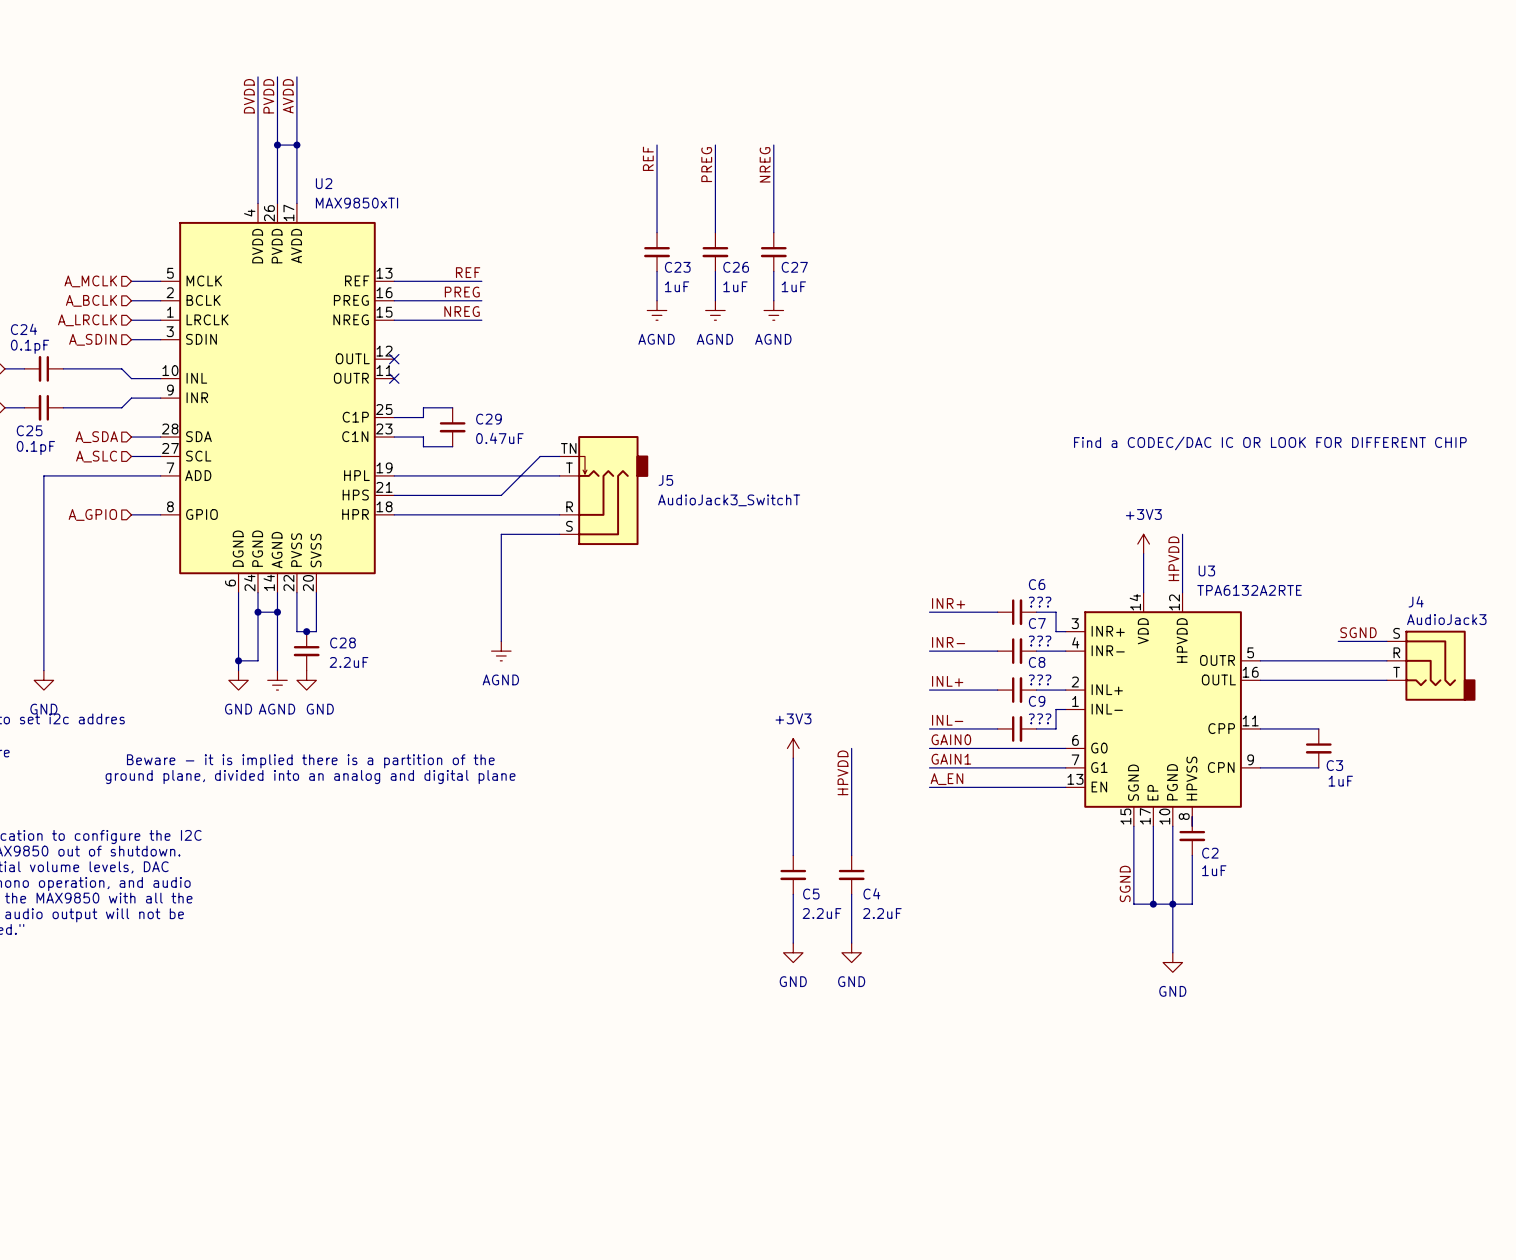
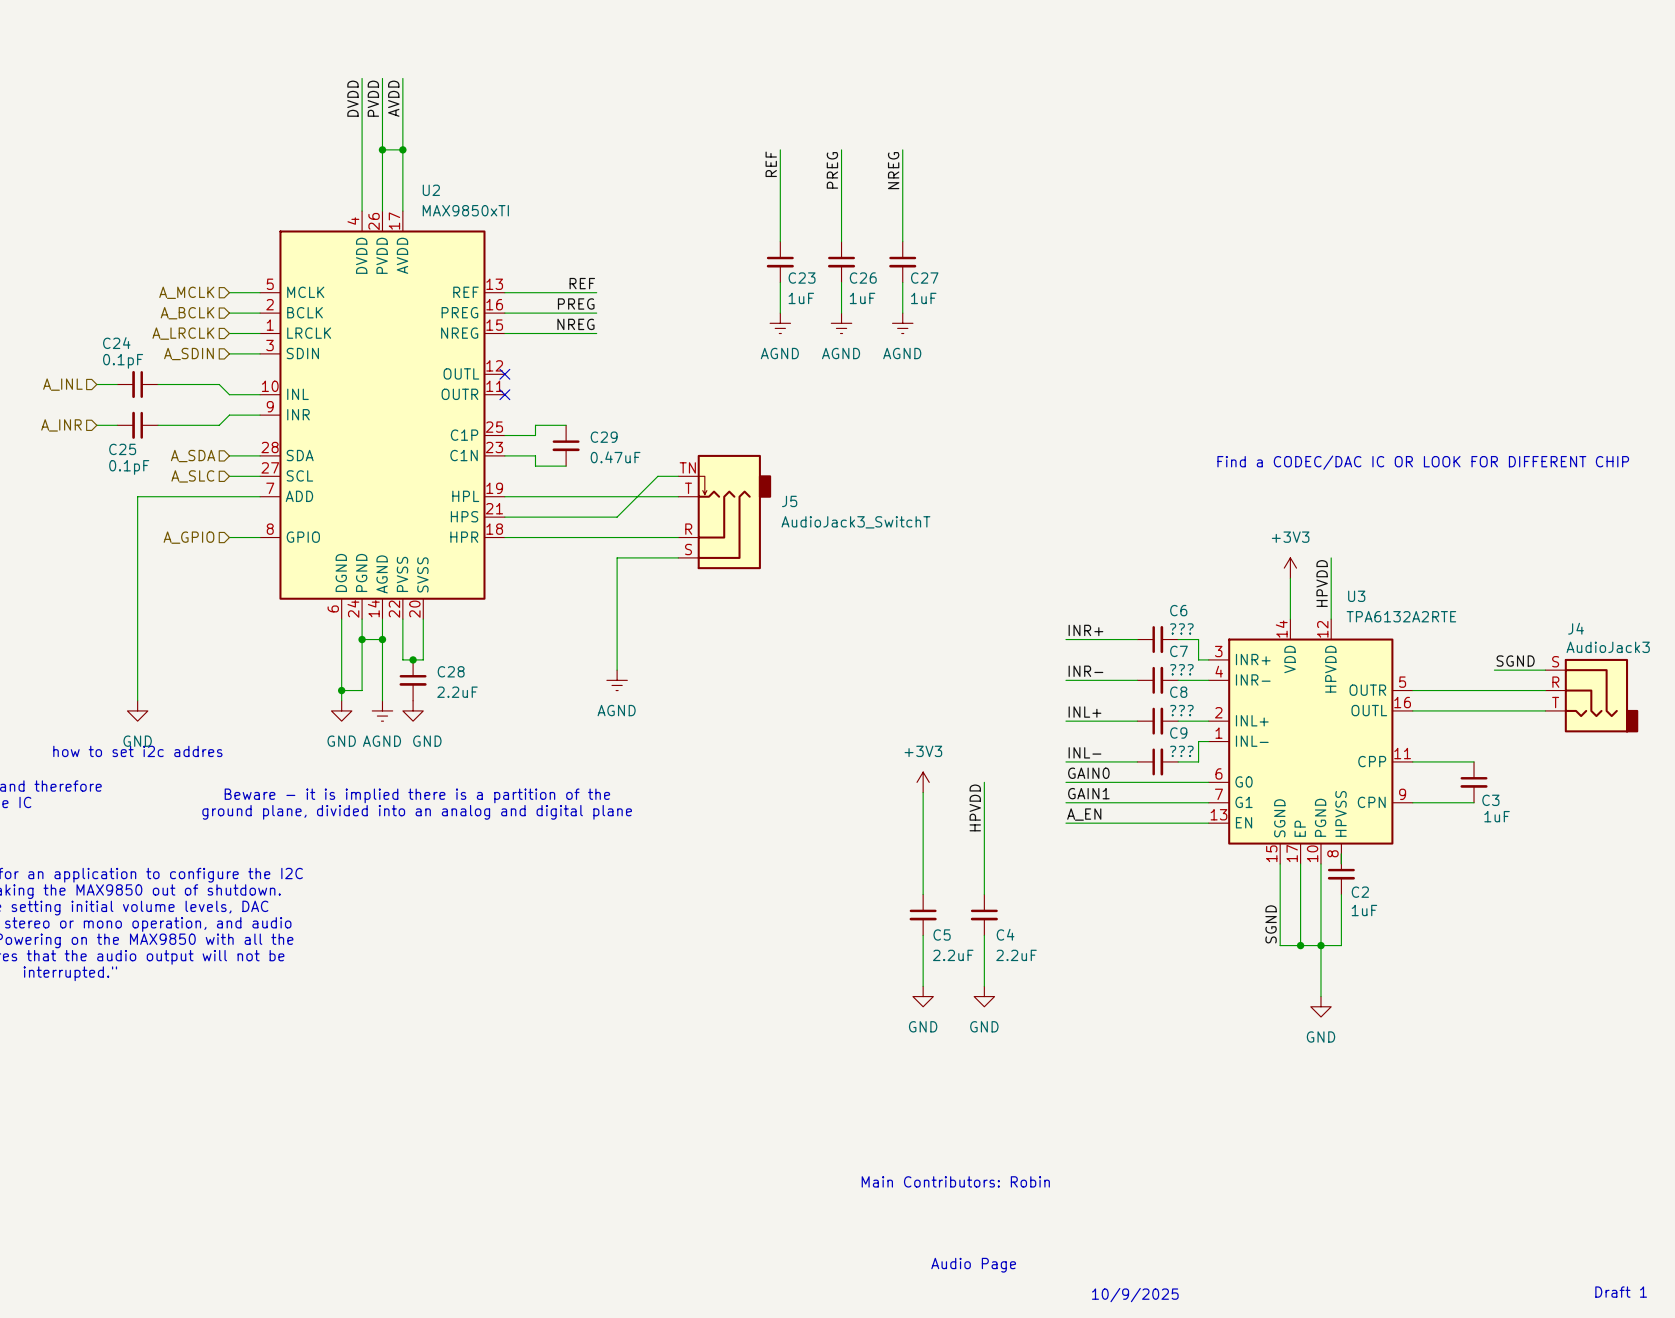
text: none -> Main Contributors: Robin (955, 1181)
text: none -> Audio Page (973, 1265)
text: none -> Draft 1 (1621, 1292)
text: none -> 10/9/2025 (1135, 1295)

